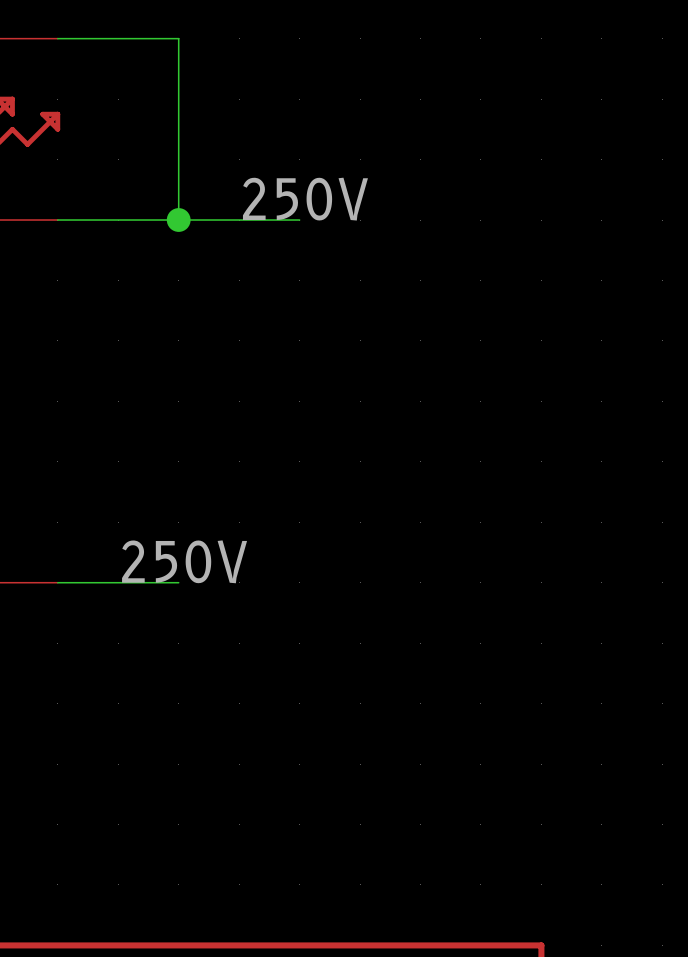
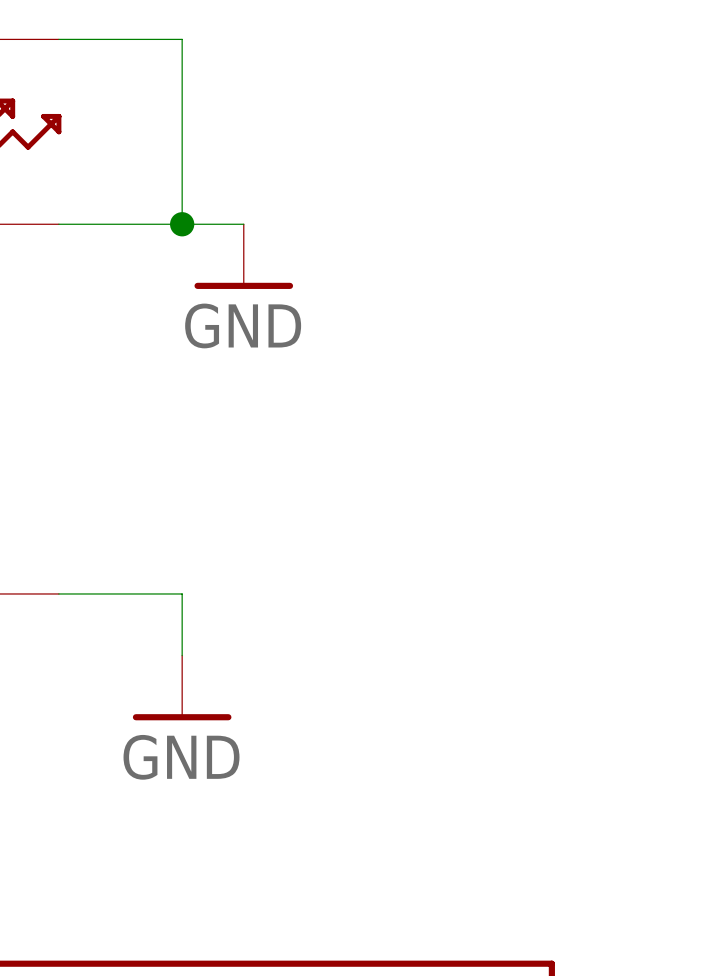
label: 250V (305, 199) -> none
wire: (239, 220) (299, 220) -> none
power symbol: none -> GND (243, 256)
label: 250V (184, 561) -> none
wire: none -> (182, 593) (182, 655)
power symbol: none -> GND (182, 687)

